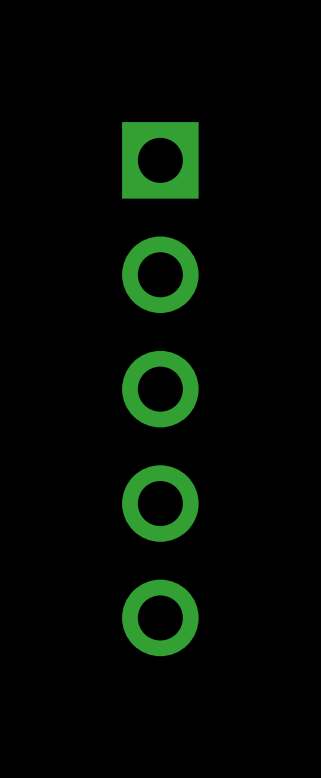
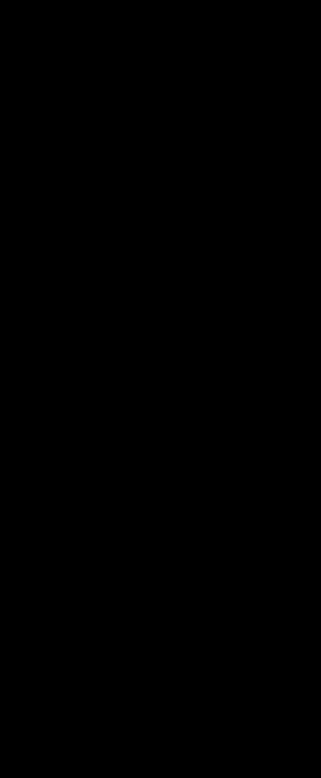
part: (160, 389) -> none

